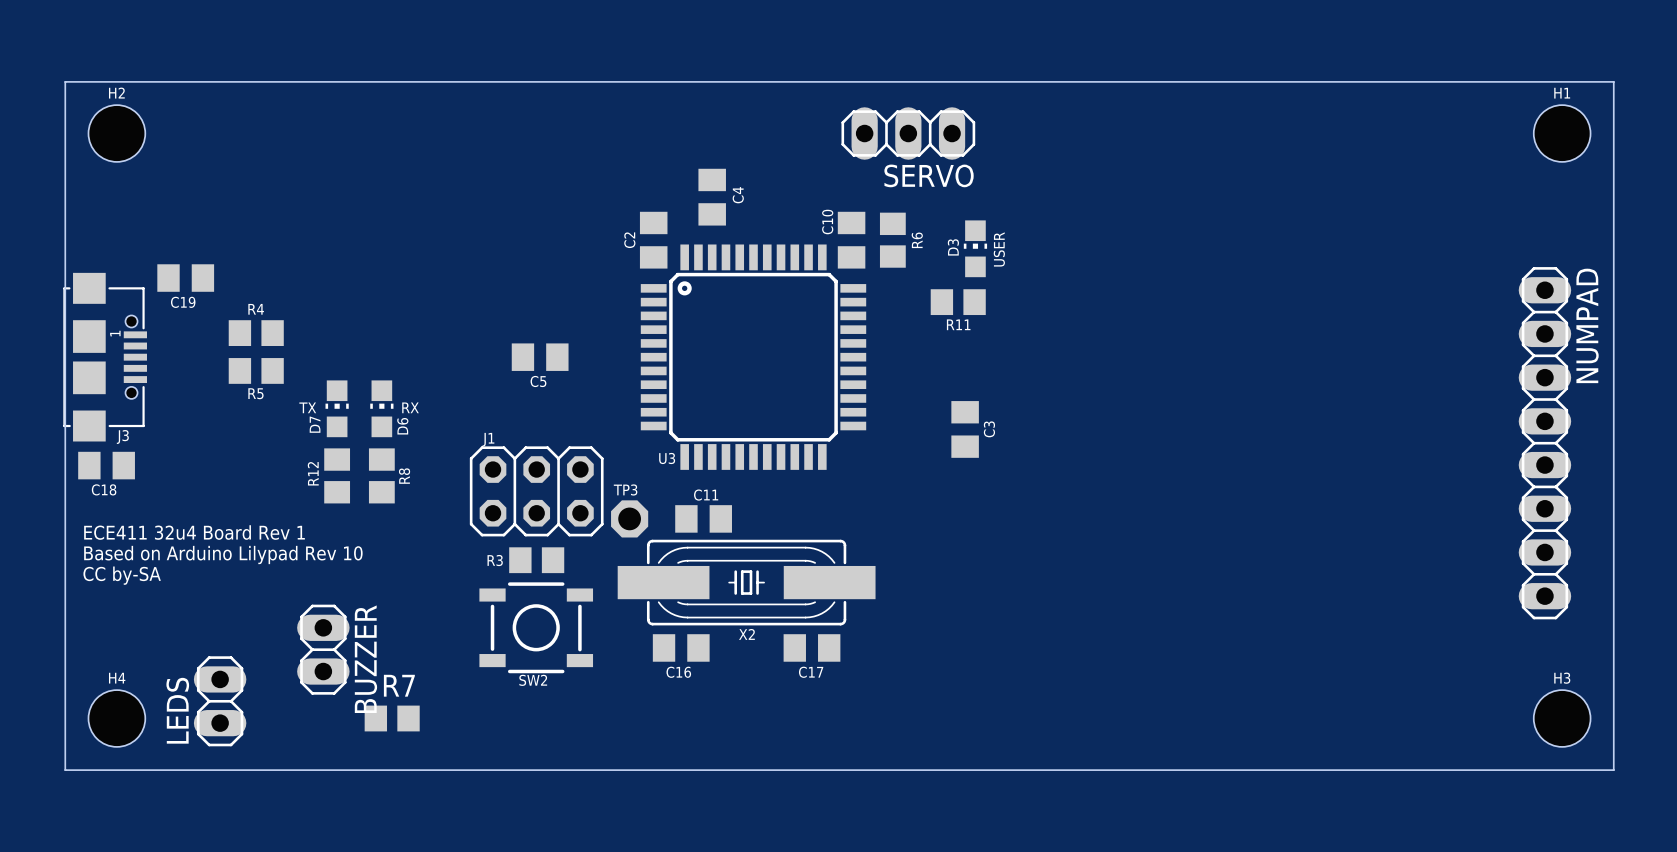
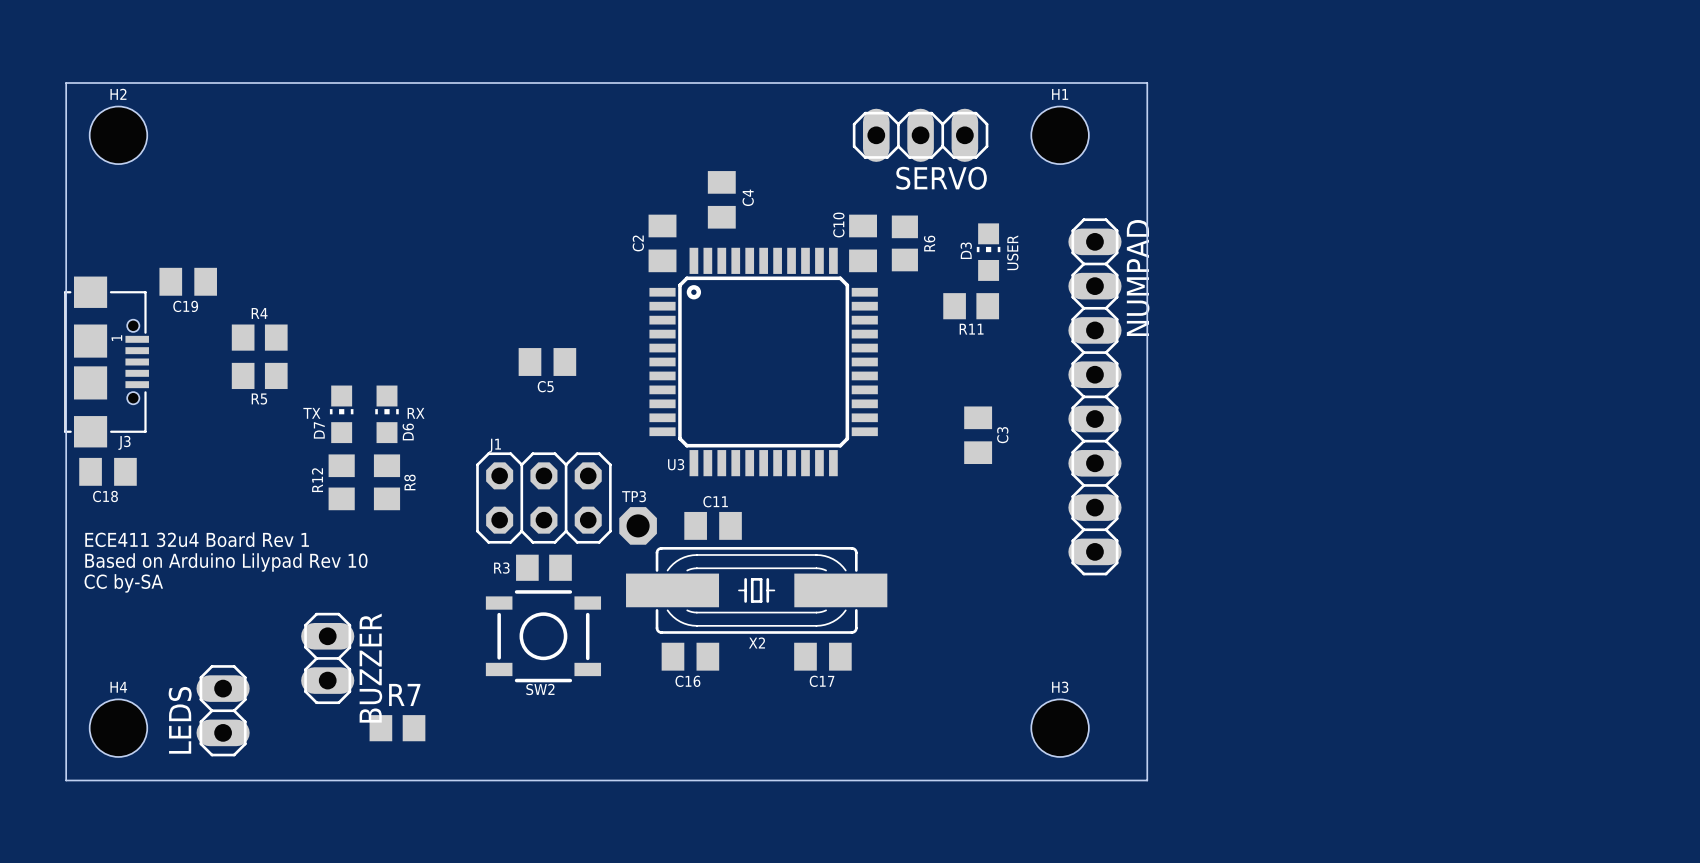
board edge: (1132, 81) (1613, 81) (1613, 770) (1132, 770) -> (1147, 83) (1147, 780)
H1 position: (1562, 133) -> (1060, 135)
NUMPAD: none -> (1094, 396)
NUMPAD: (1544, 443) -> none
H3 position: (1562, 718) -> (1060, 728)

